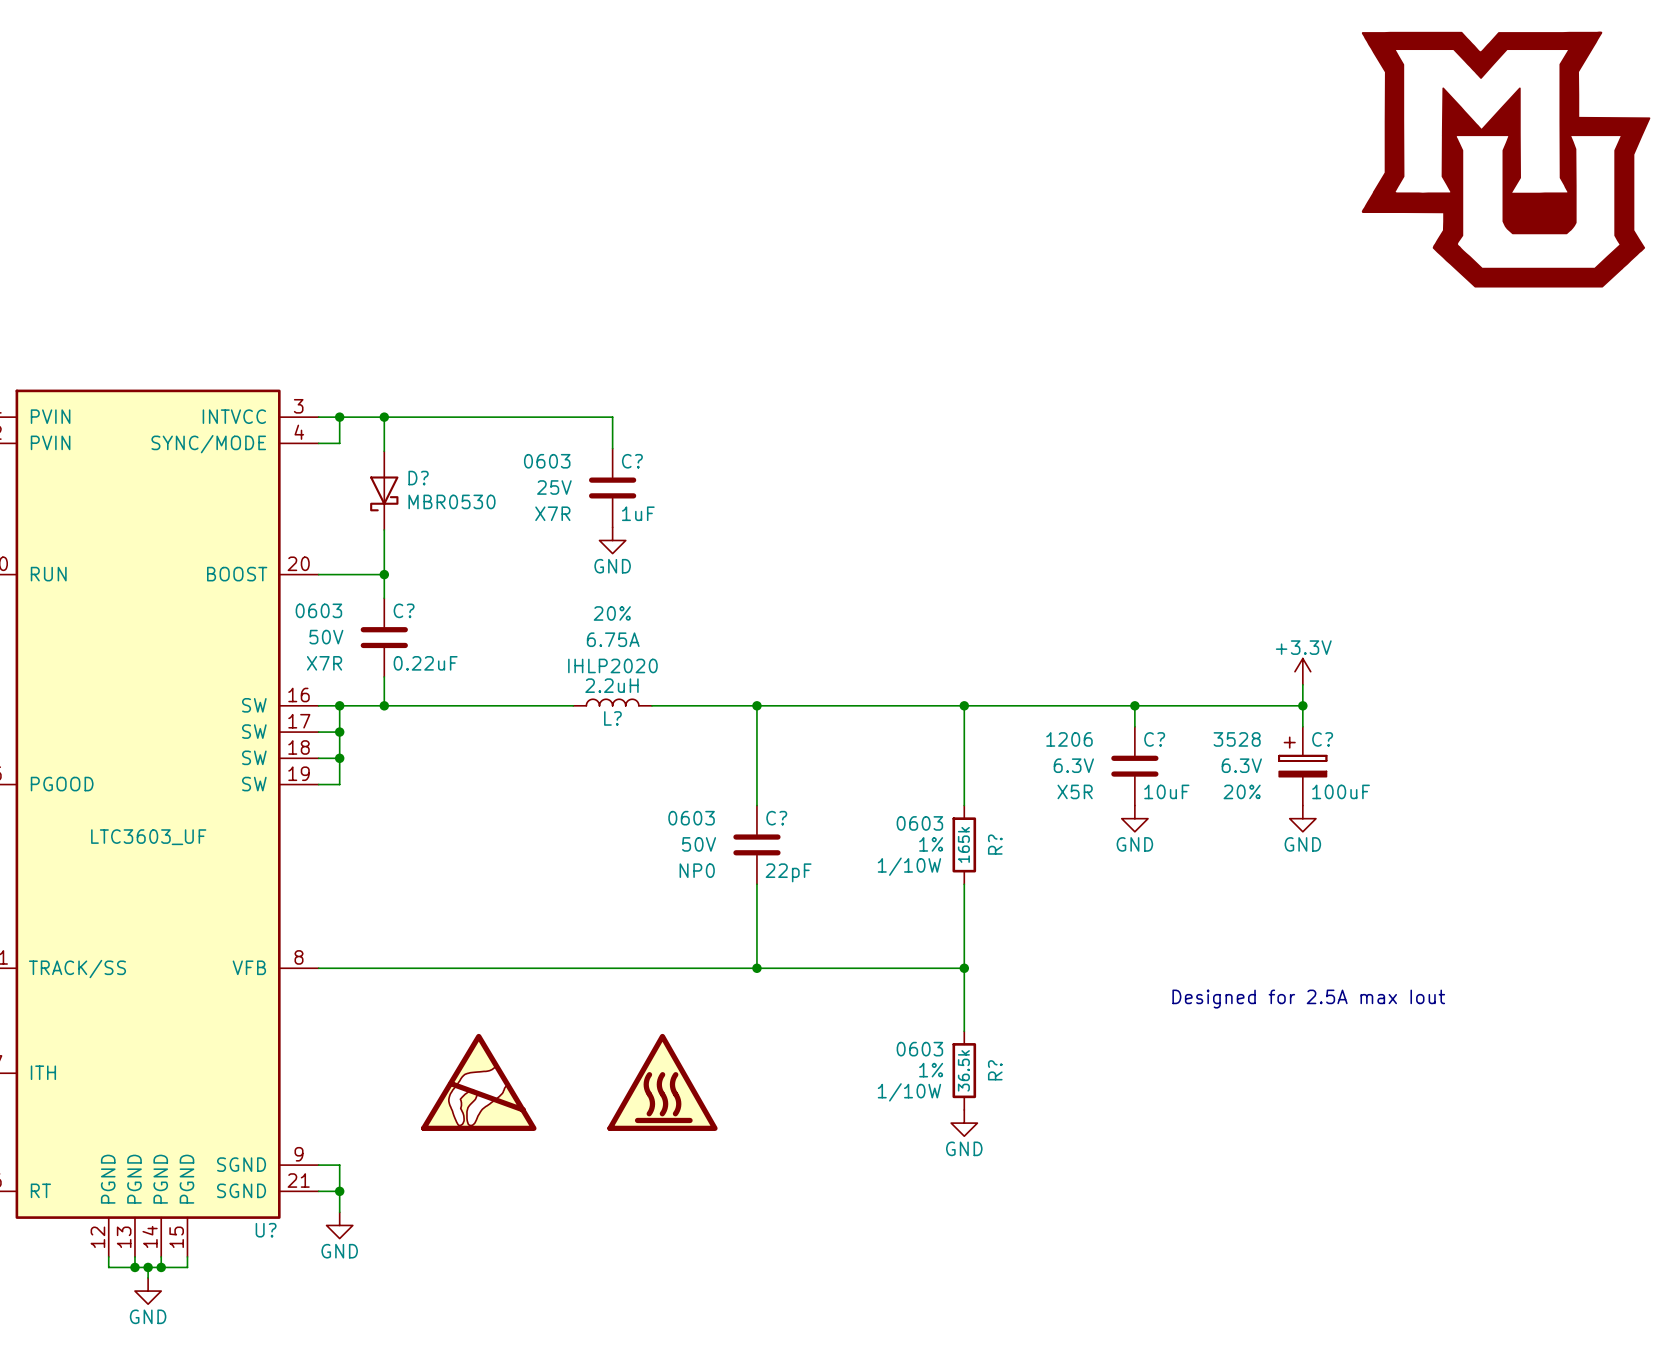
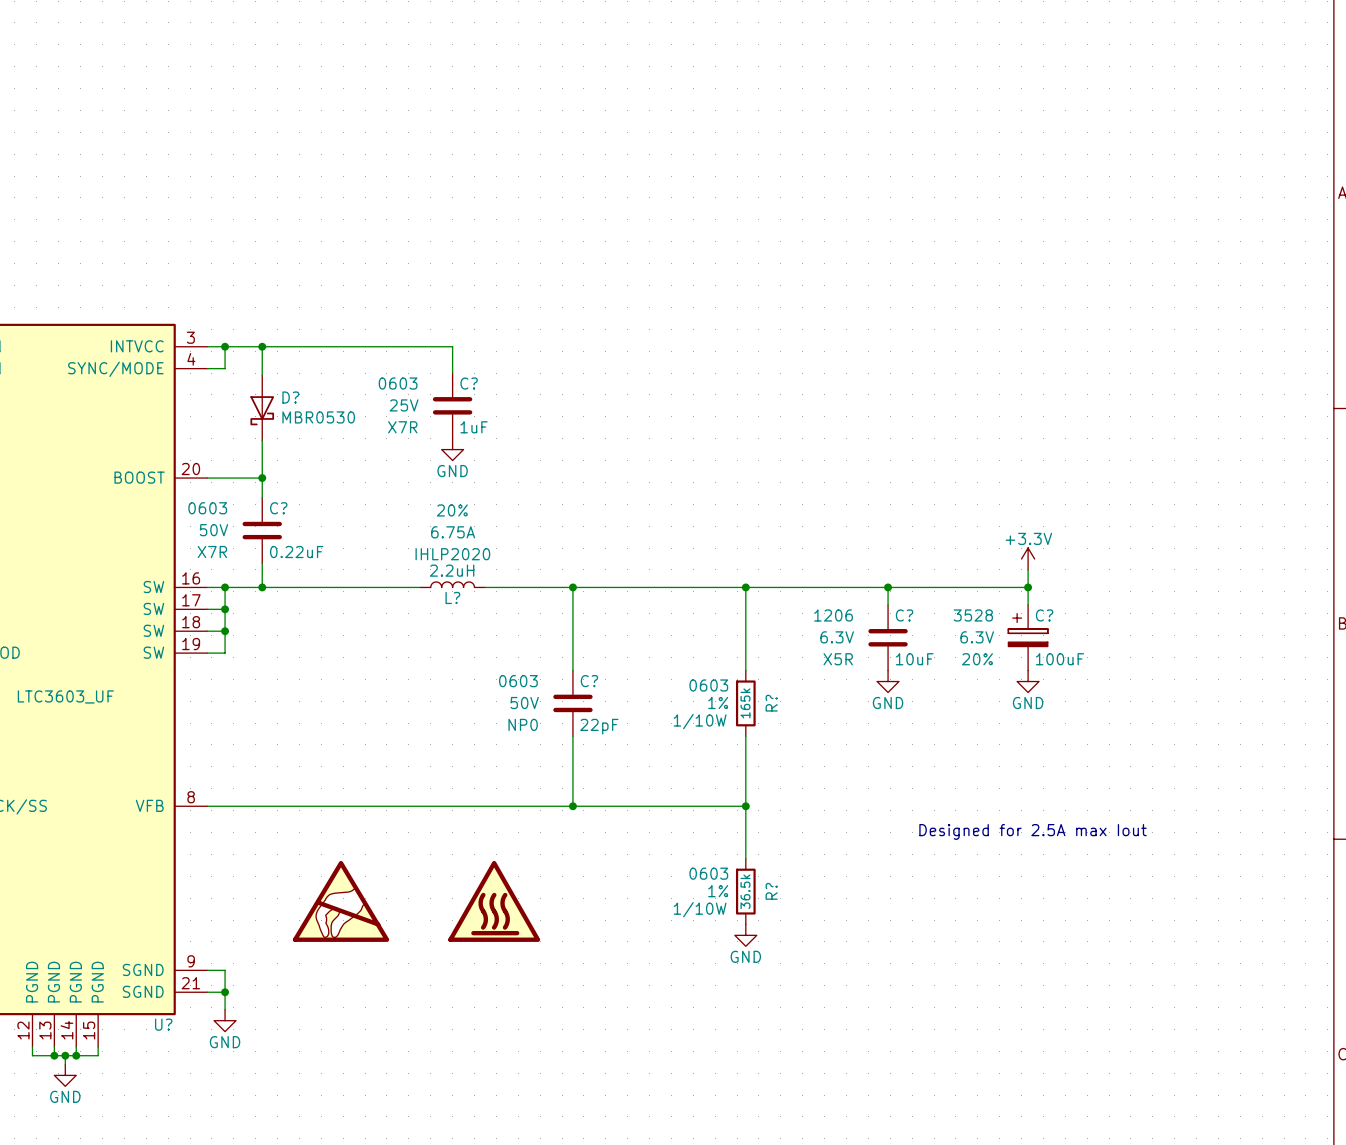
power symbol: (1506, 159) -> none

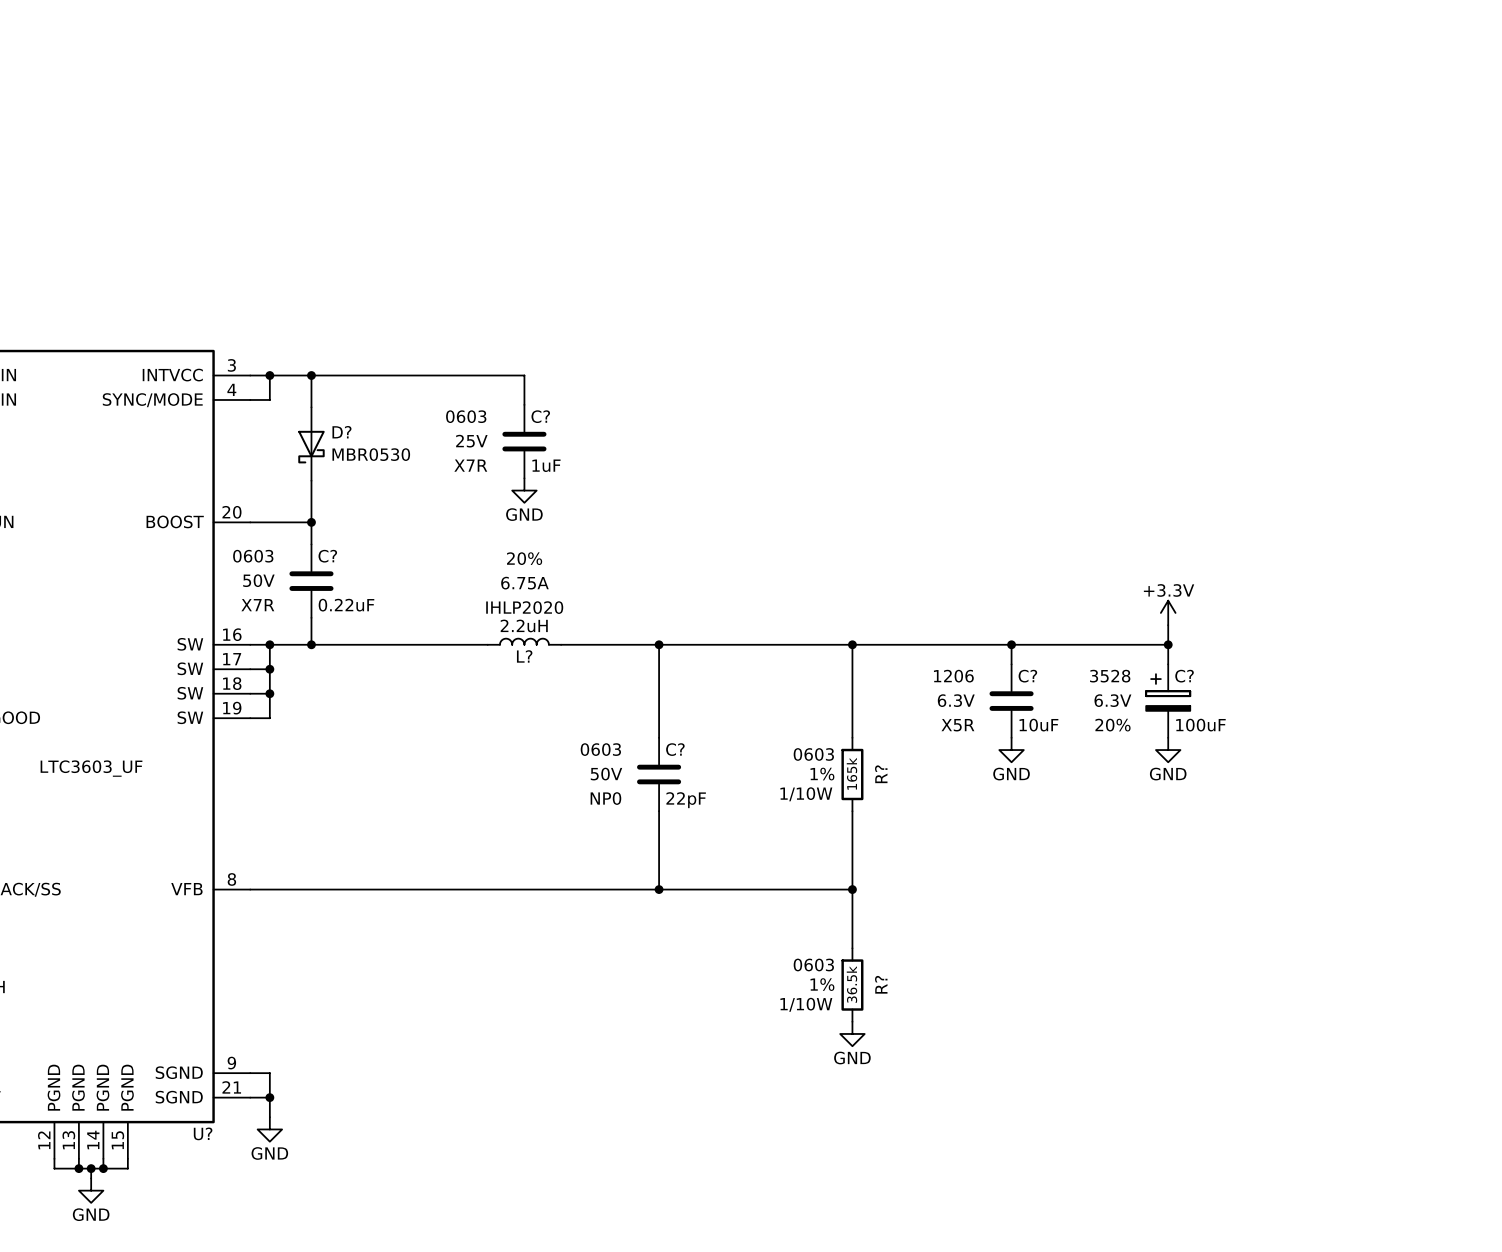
text: Designed for 2.5A max Iout (1033, 831) -> none
power symbol: (341, 901) -> none
power symbol: (494, 901) -> none

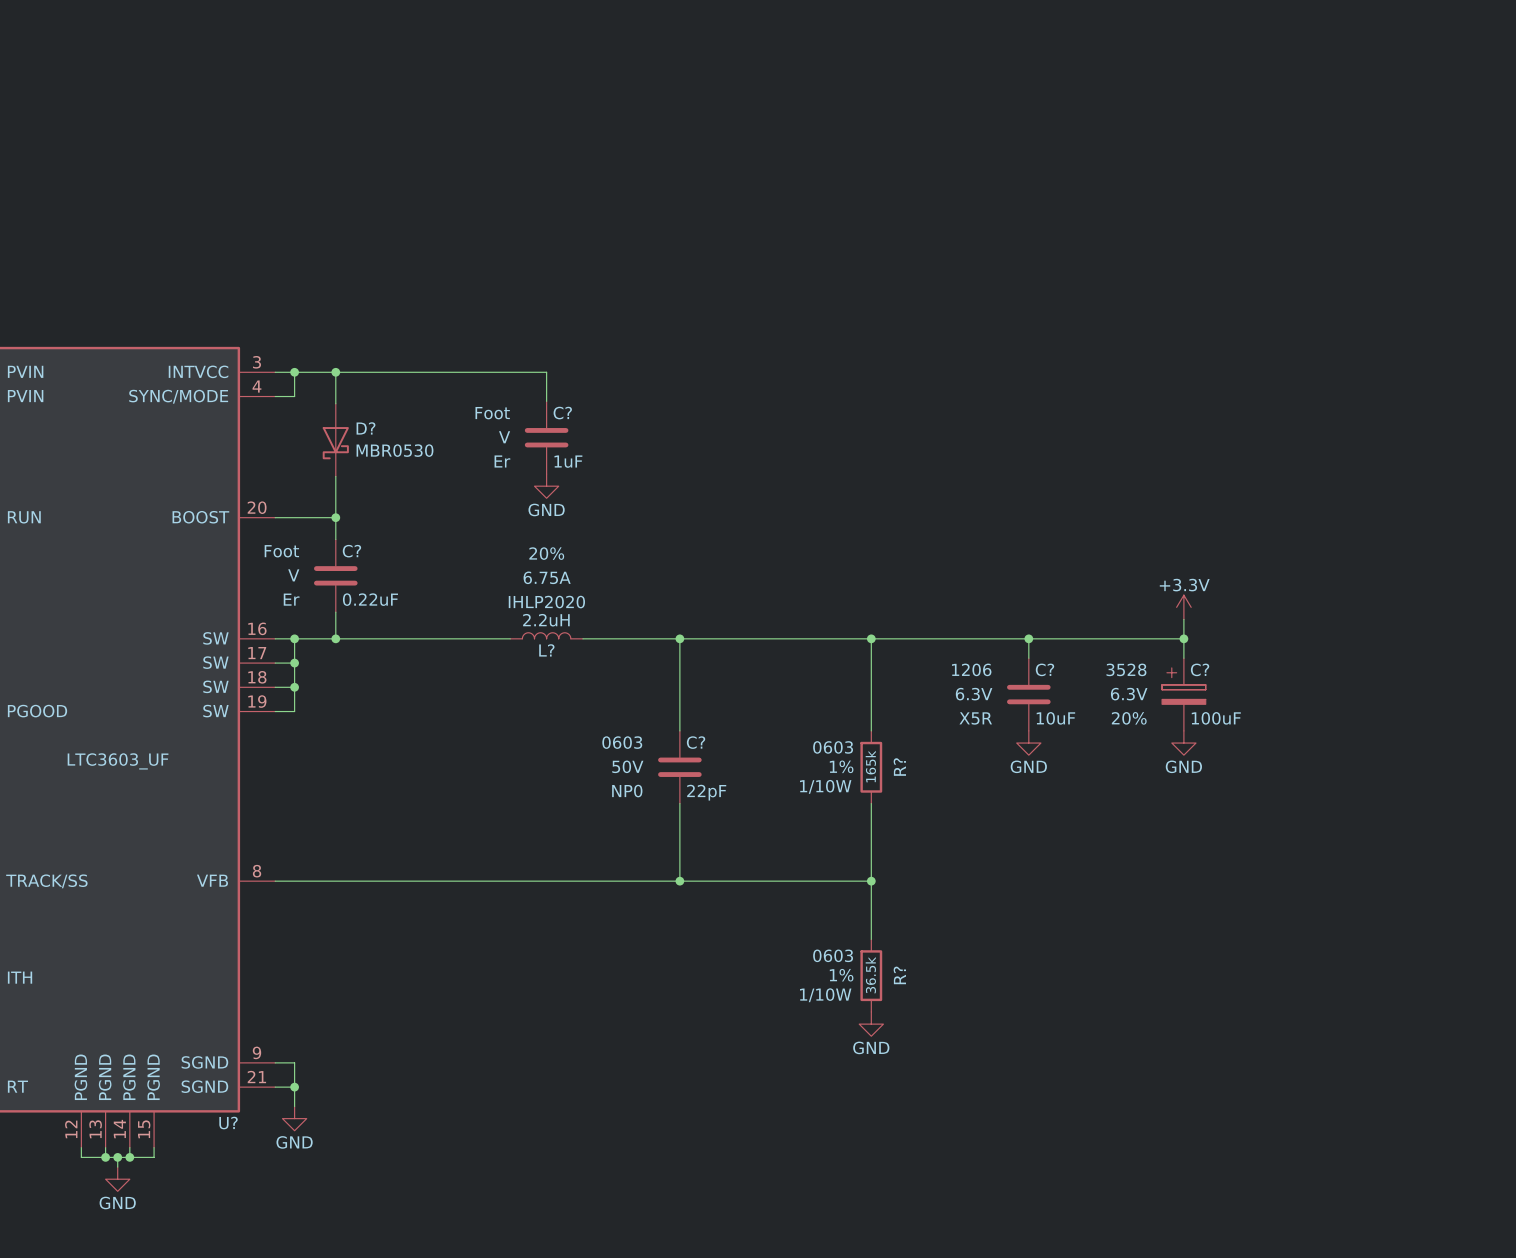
C? text: 0603 (466, 416) -> Foot (492, 413)
C? text: 25V (471, 441) -> V (504, 437)
C? text: X7R (470, 465) -> Er (502, 461)
C? text: 0603 (253, 556) -> Foot (281, 551)
C? text: 50V (258, 580) -> V (293, 575)
C? text: X7R (257, 605) -> Er (291, 599)

